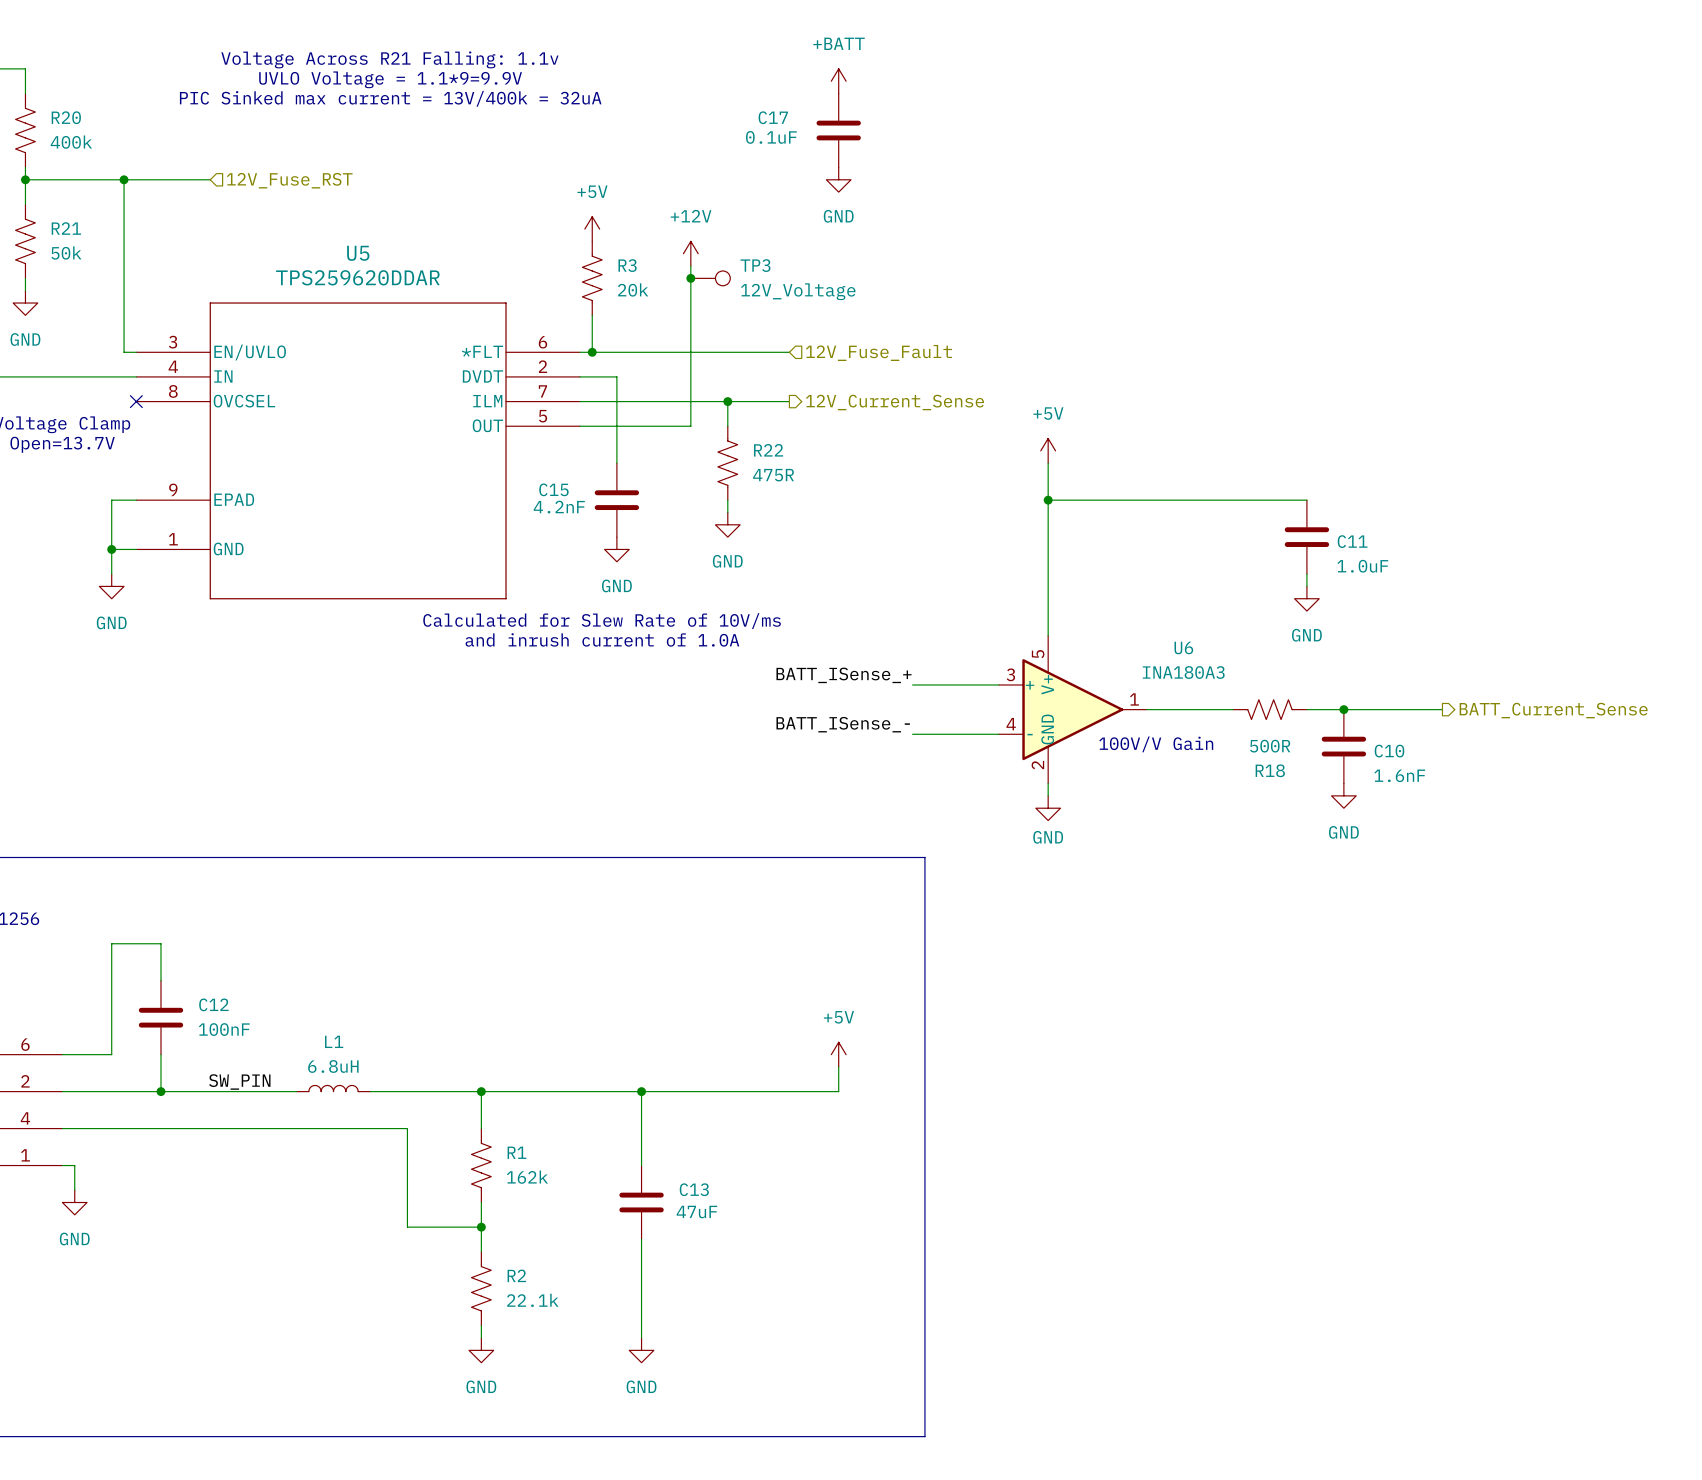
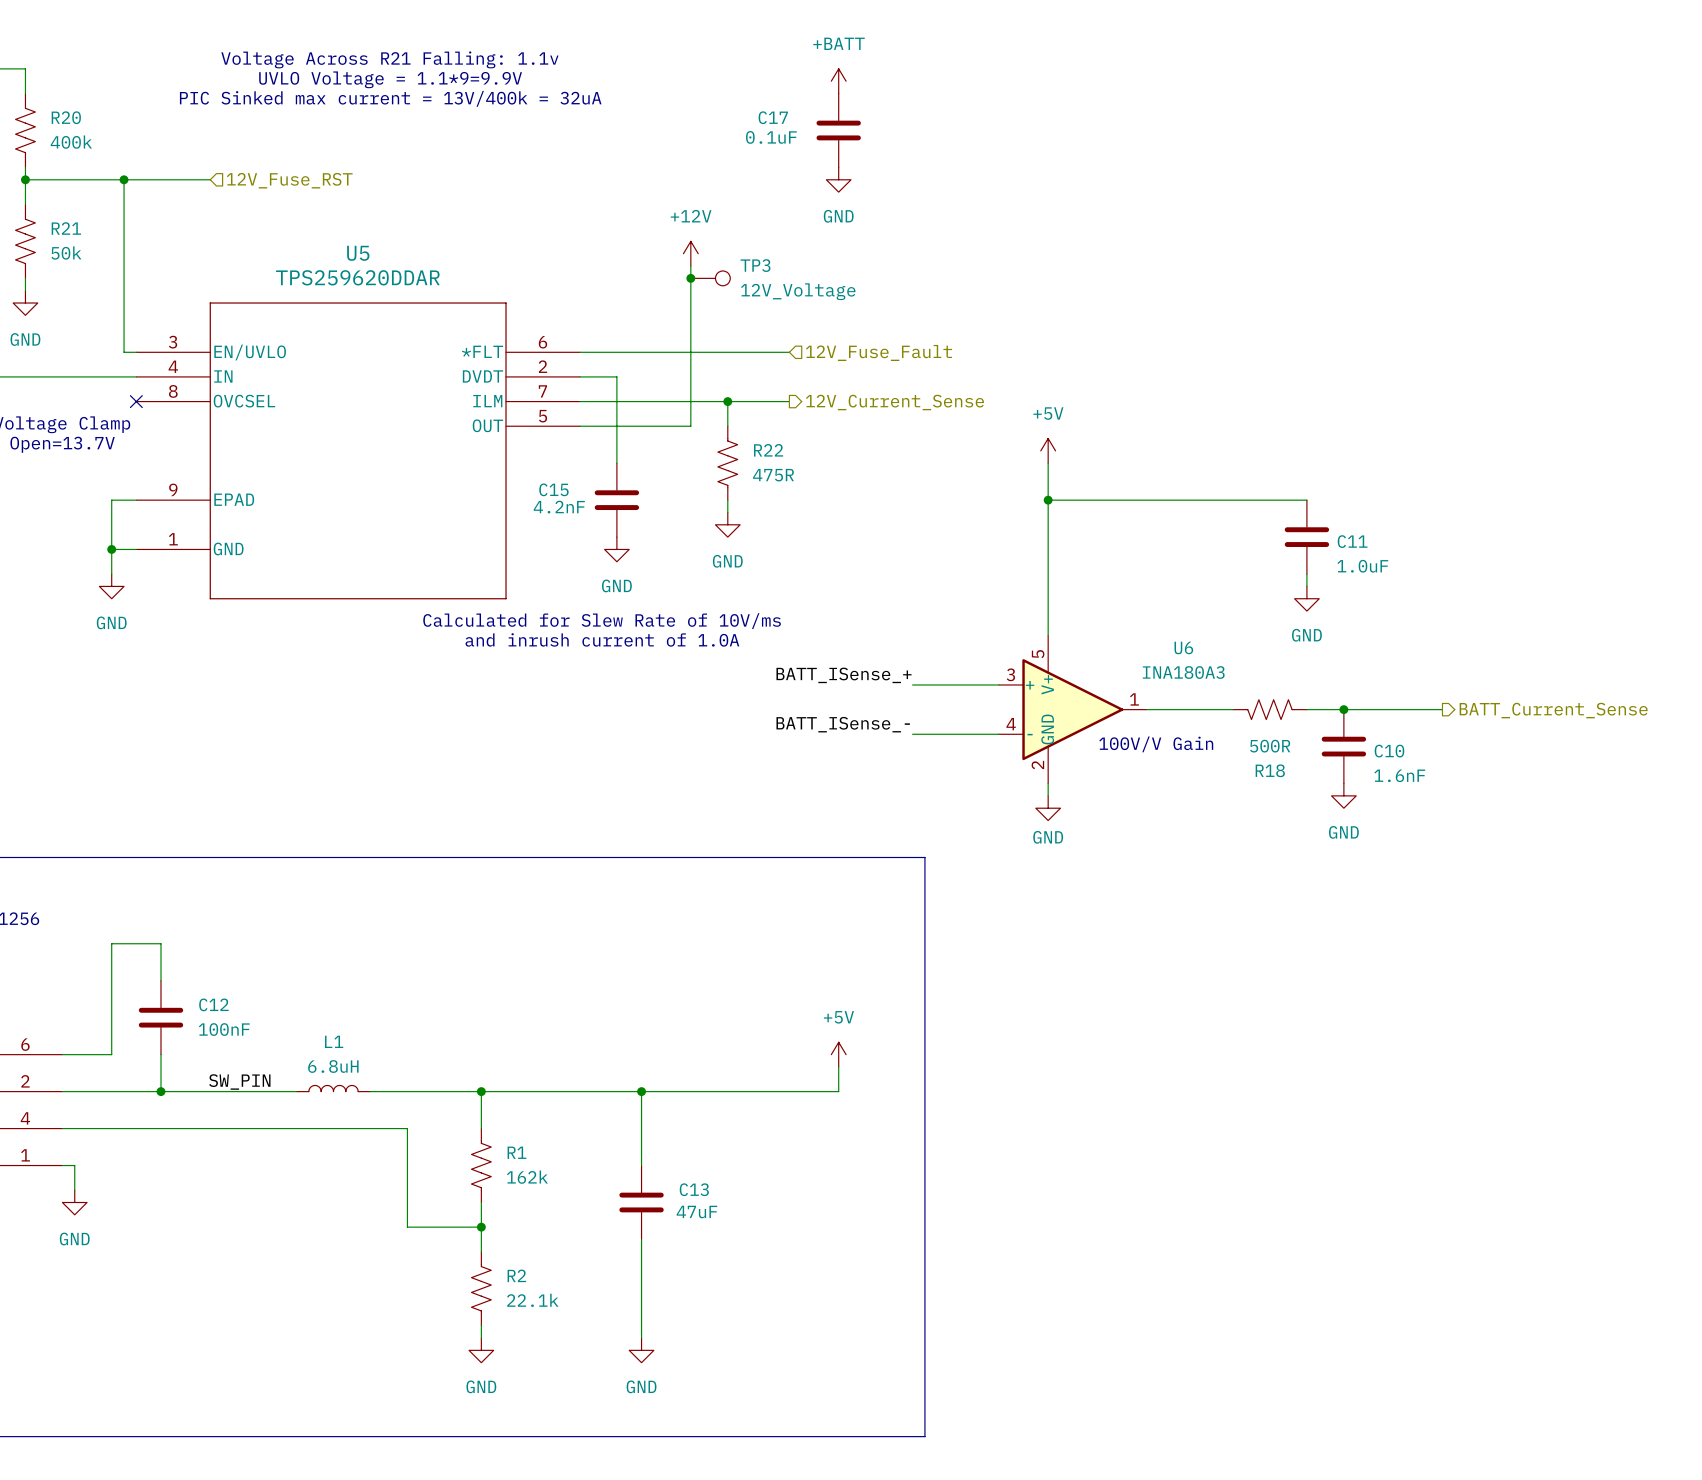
power symbol: +5V (592, 229) -> none
R3: 20k (592, 278) -> none
wire: (592, 315) (592, 352) -> none
junction: (592, 352) -> none

